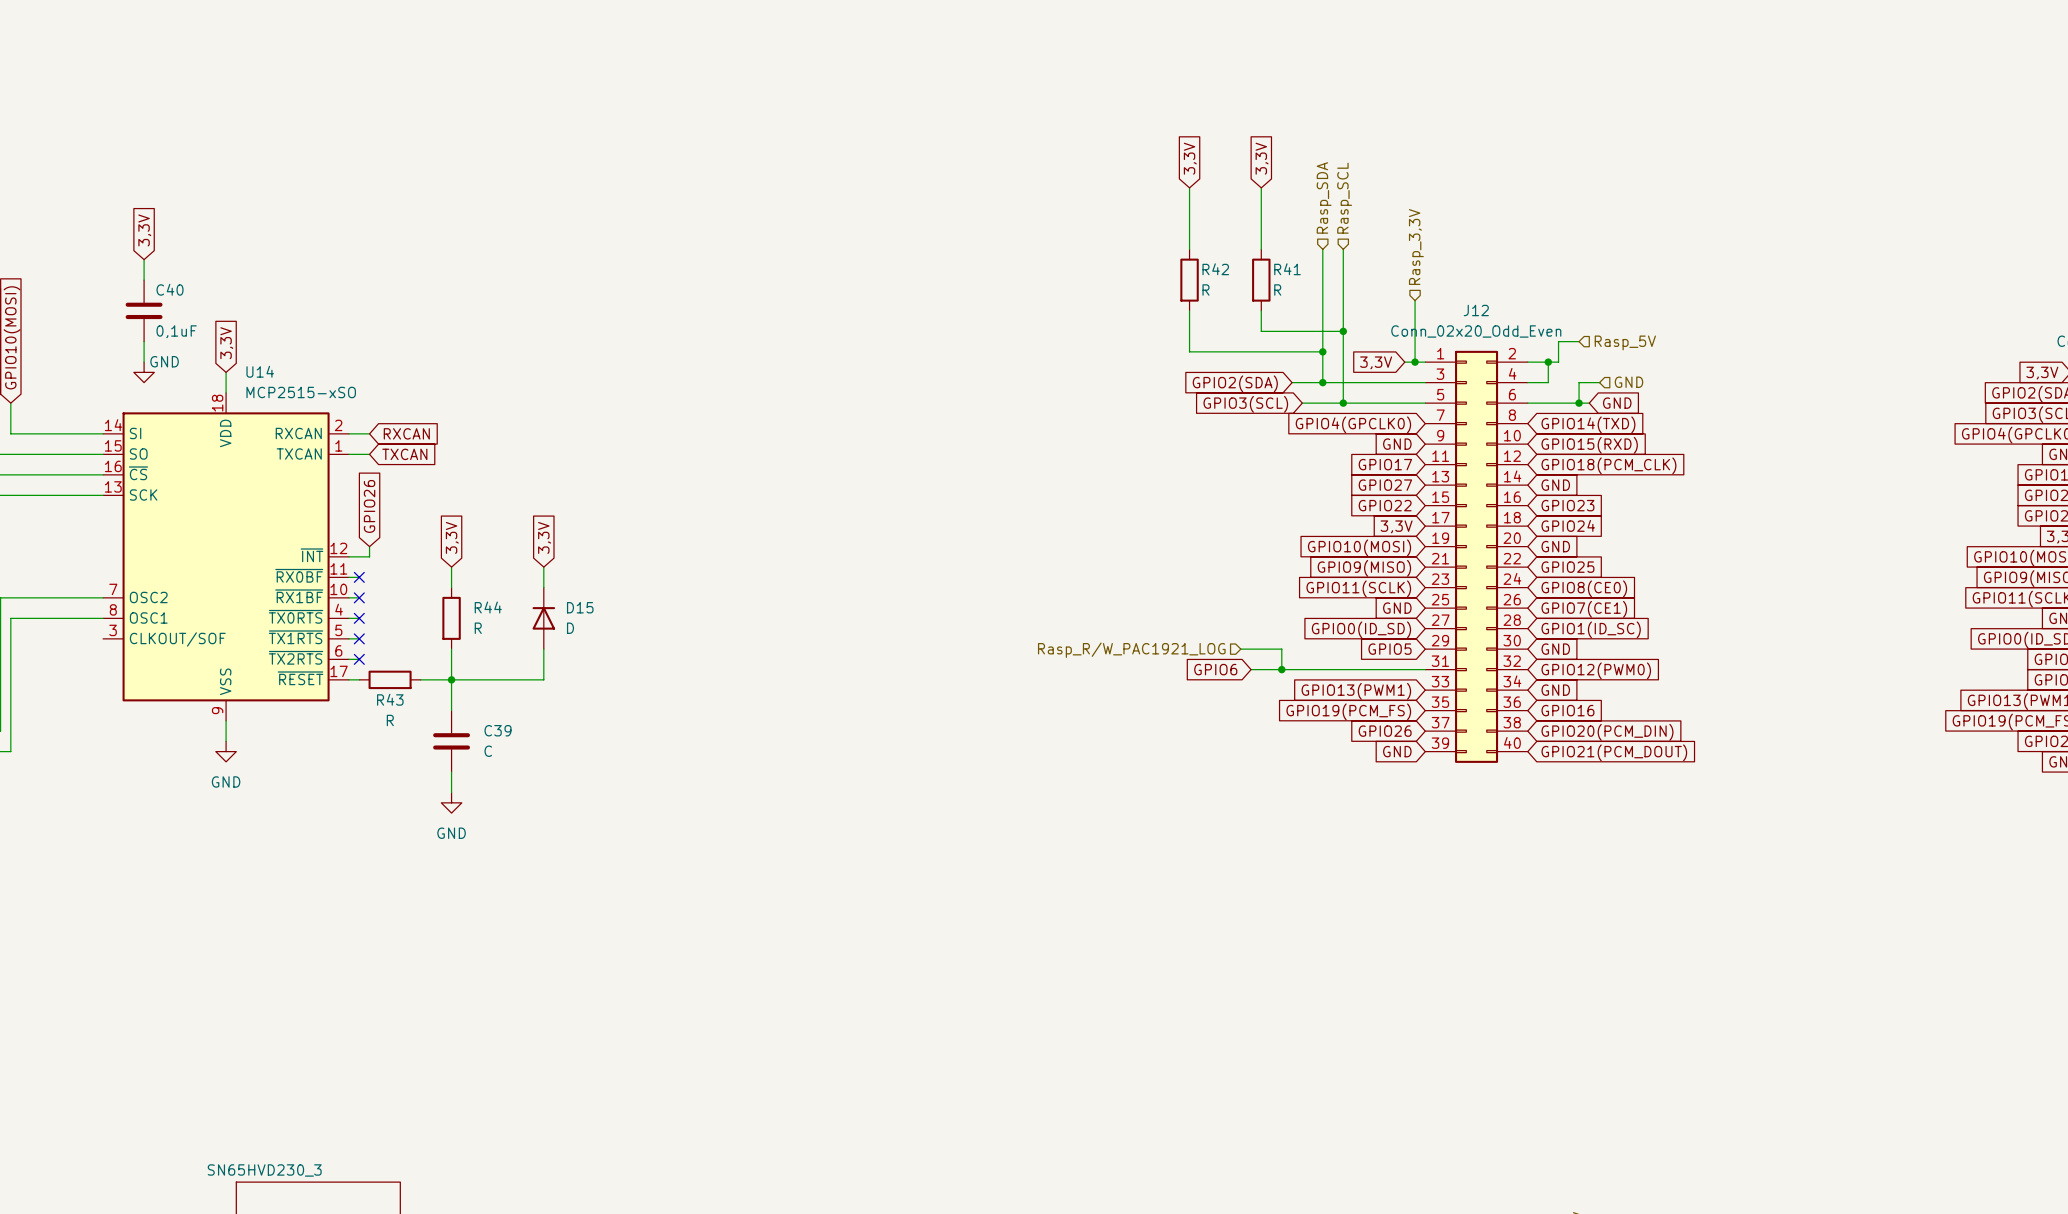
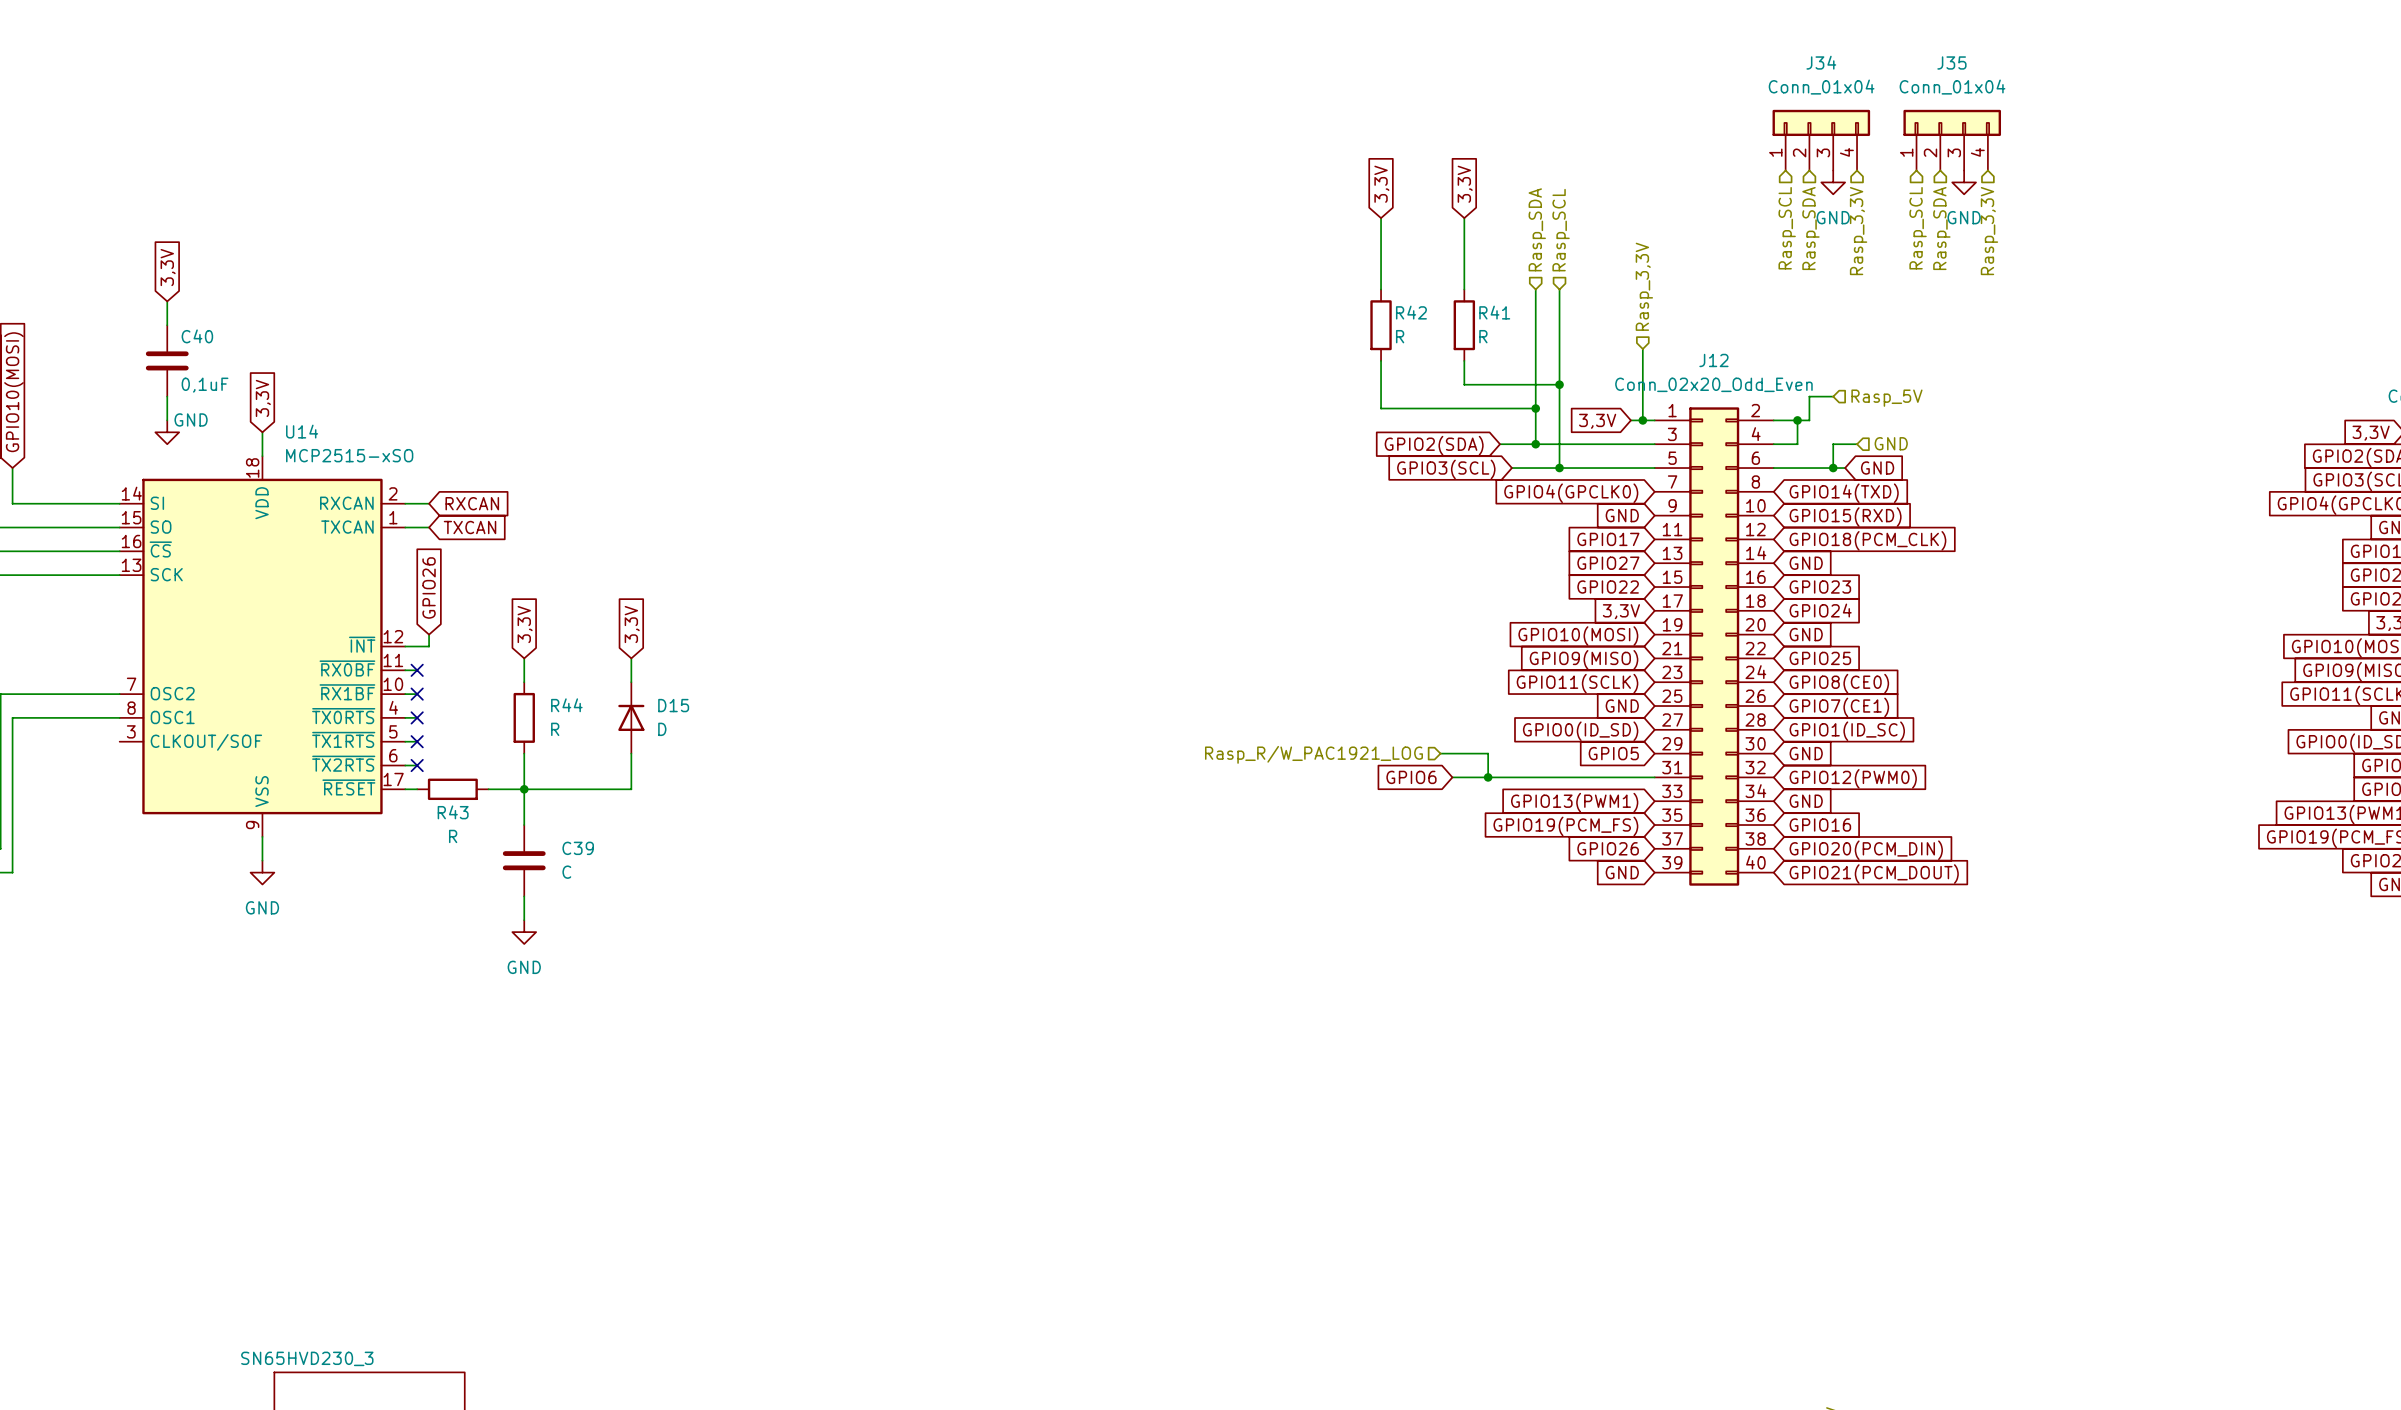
J34: none -> Conn_01x04 (1821, 140)
J35: none -> Conn_01x04 (1952, 140)
power symbol: none -> GND (1833, 182)
power symbol: none -> GND (1964, 182)
hierarchical label: none -> Rasp_SCL (1787, 228)
hierarchical label: none -> Rasp_SDA (1810, 228)
hierarchical label: none -> Rasp_SCL (1918, 228)
hierarchical label: none -> Rasp_SDA (1941, 228)
hierarchical label: none -> Rasp_3,3V (1858, 231)
hierarchical label: none -> Rasp_3,3V (1989, 231)

